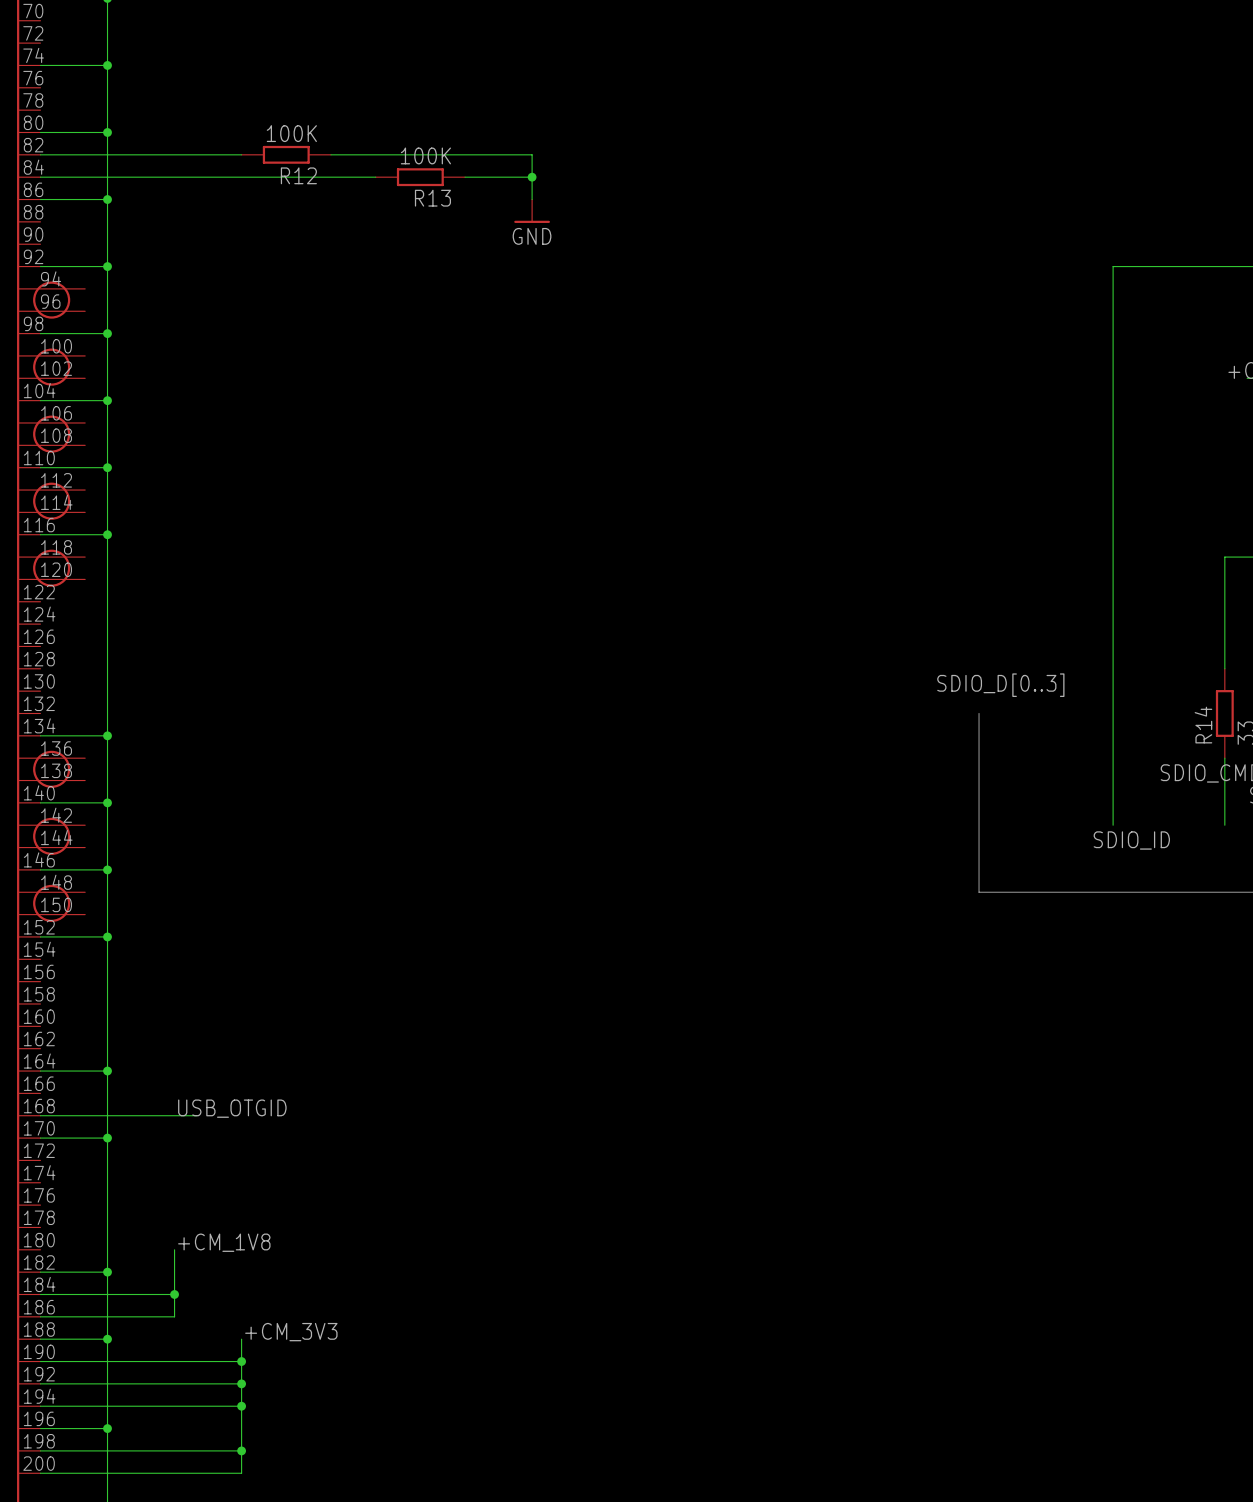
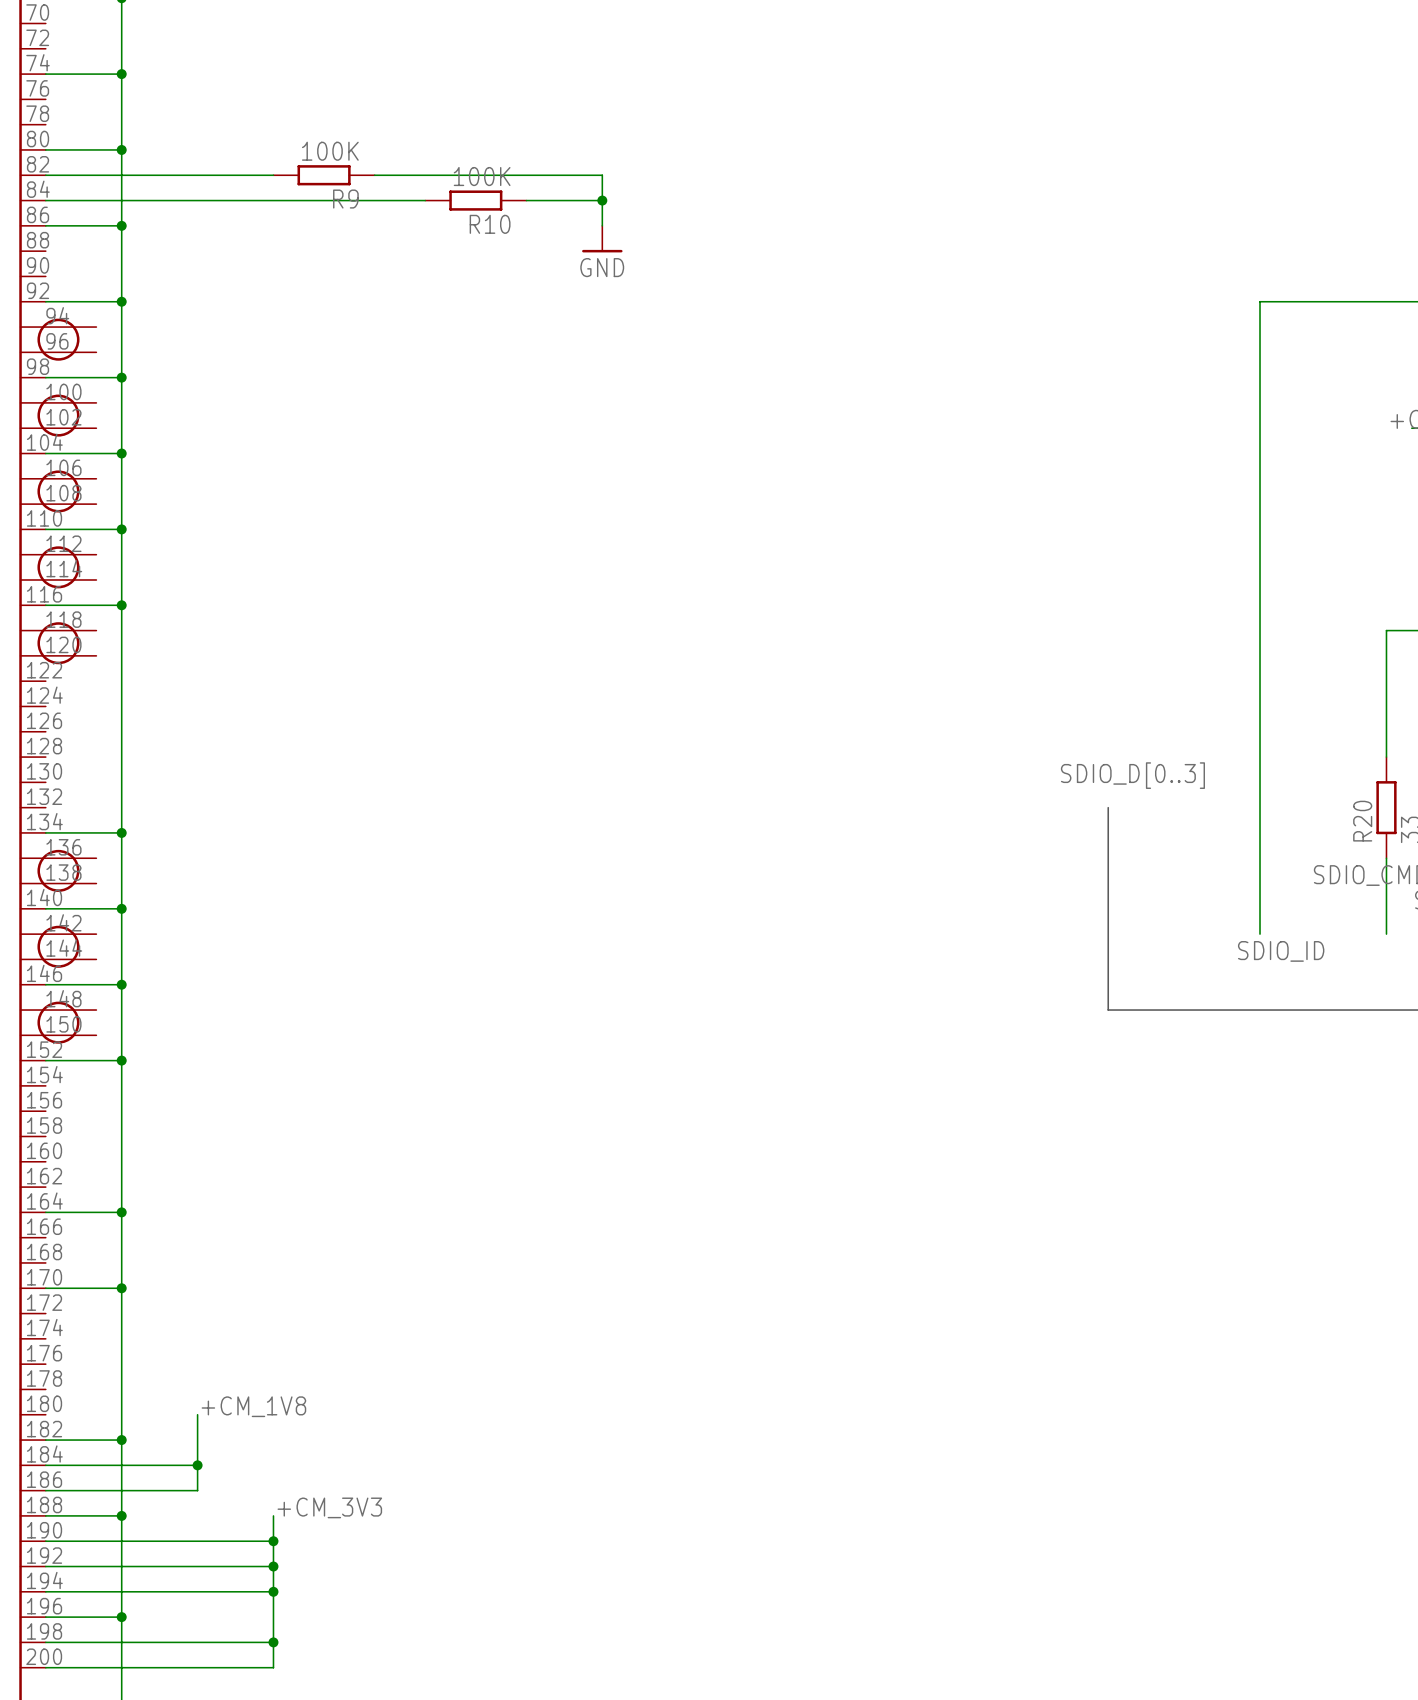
R12 name: R12 (298, 175) -> R9 (345, 199)
R13 name: R13 (432, 198) -> R10 (490, 224)
R14 name: R14 (1203, 725) -> R20 (1362, 821)
label: USB_OTGID (232, 1108) -> none
wire: (40, 1115) (196, 1115) -> none

